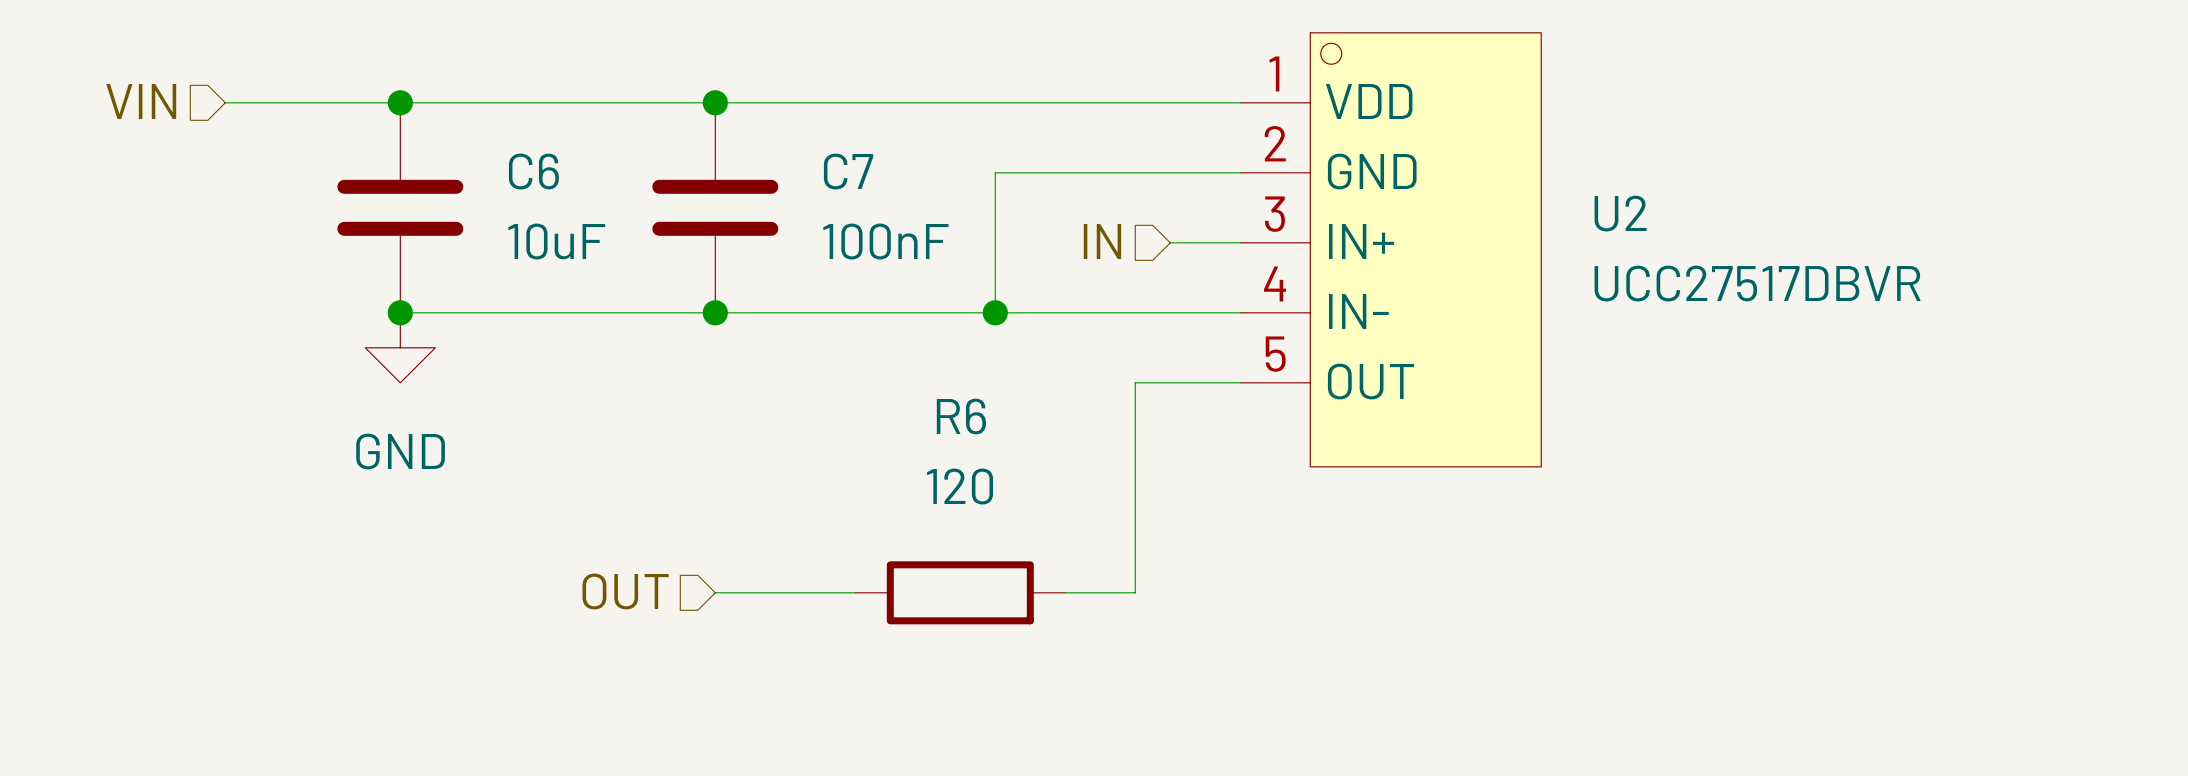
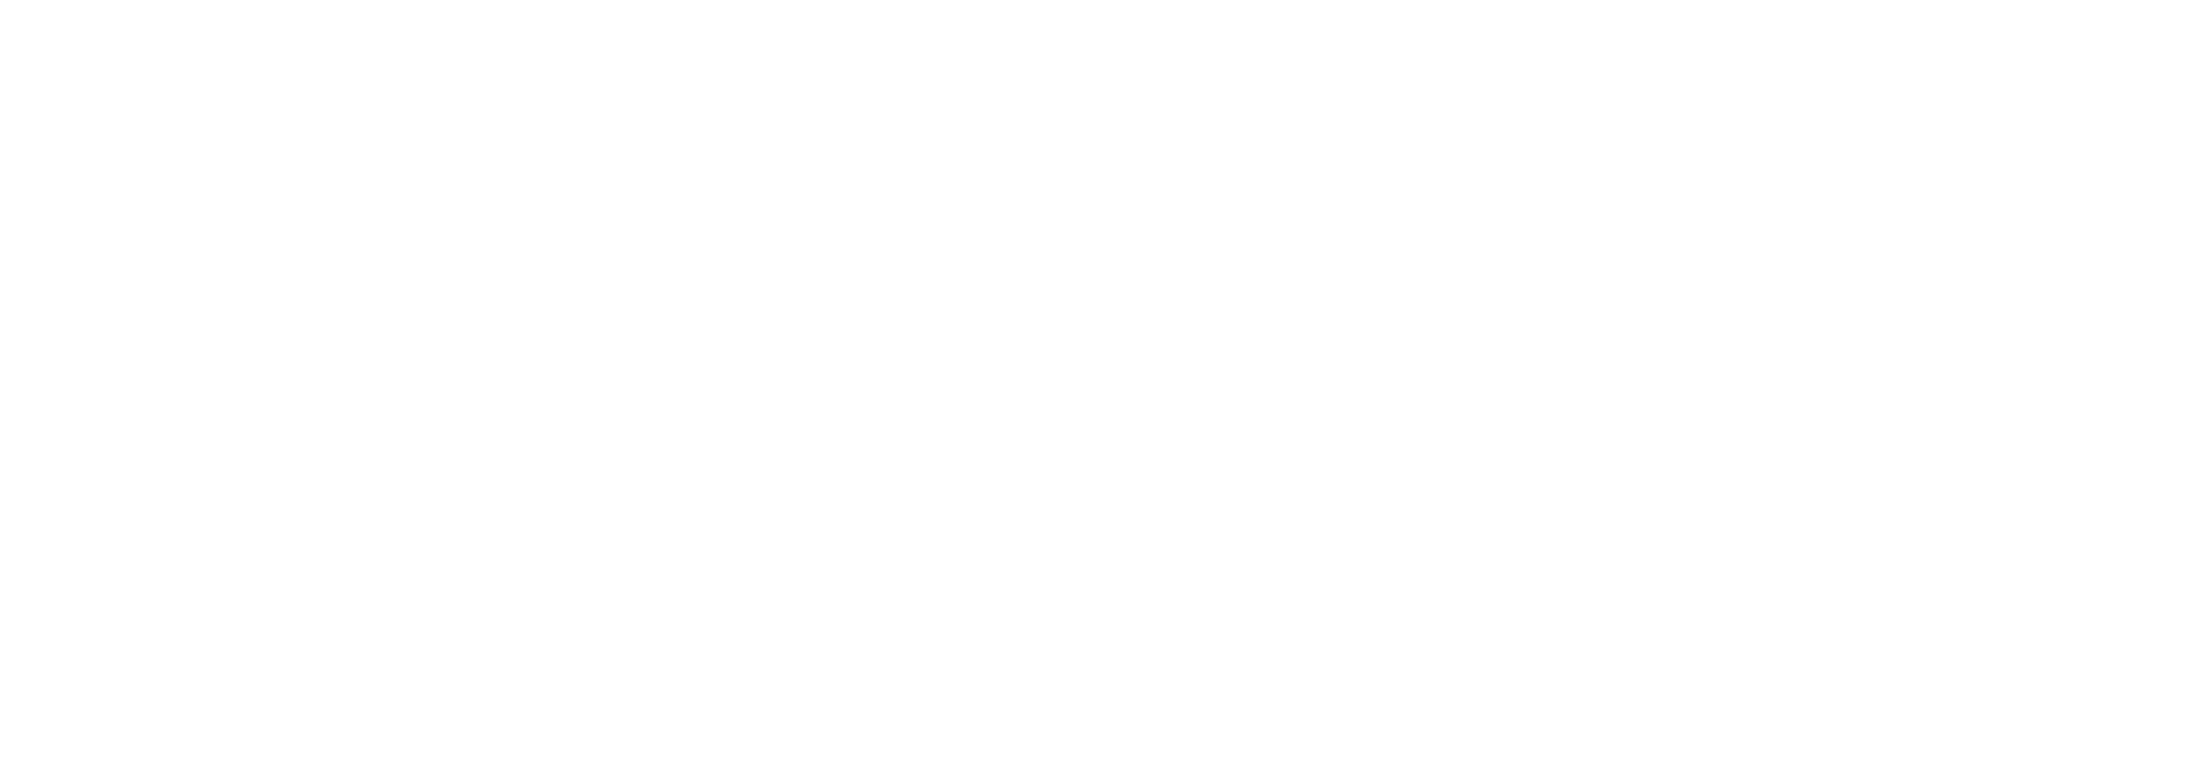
hierarchical label: VIN (141, 101) -> none
wire: (225, 102) (1240, 102) -> none
junction: (400, 102) -> none
junction: (715, 102) -> none
wire: (1240, 172) (995, 172) (995, 312) -> none
C6: 10uF (400, 207) -> none
C7: 100nF (715, 207) -> none
hierarchical label: IN (1102, 241) -> none
wire: (1170, 242) (1240, 242) -> none
U2: UCC27517DBVR (1390, 249) -> none
wire: (400, 312) (1240, 312) -> none
junction: (400, 312) -> none
junction: (715, 312) -> none
junction: (995, 312) -> none
power symbol: GND (400, 347) -> none
wire: (1240, 382) (1135, 382) (1135, 592) (1065, 592) -> none
hierarchical label: OUT (625, 591) -> none
wire: (715, 592) (855, 592) -> none
R6: 120 (960, 592) -> none

